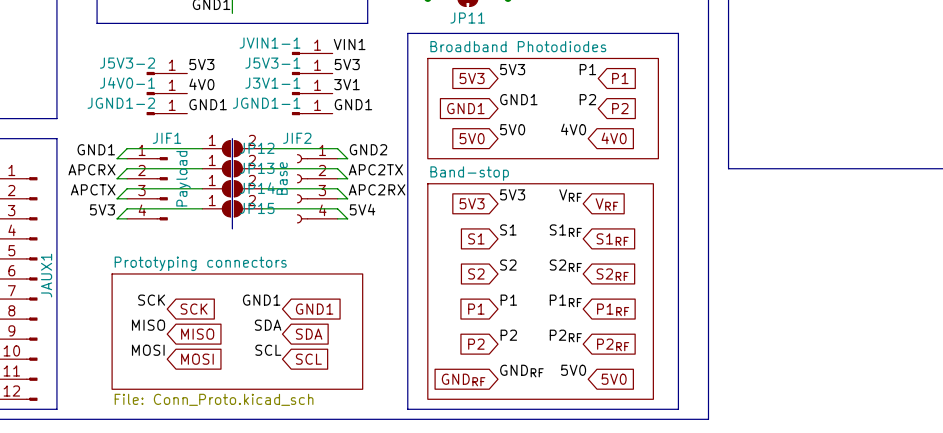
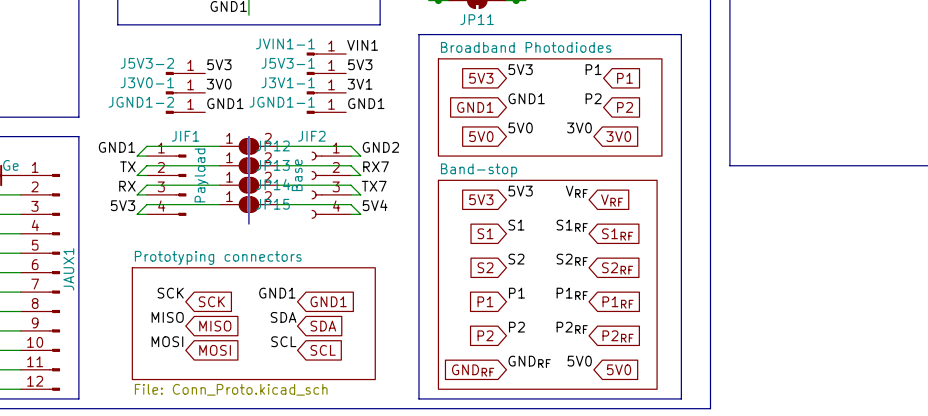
J4V0-1 name: J4V0-1 (127, 82) -> J3V0-1 (147, 82)
label: 4V0 (201, 84) -> 3V0 (219, 84)
label: 4V0 (573, 129) -> 3V0 (579, 127)
global label: 4V0 (614, 138) -> 3V0 (618, 136)
label: APCRX (91, 169) -> TX (127, 166)
label: APC2TX (375, 169) -> RX7 (376, 166)
label: APCTX (93, 189) -> RX (127, 186)
label: APC2RX (377, 189) -> TX7 (374, 186)

